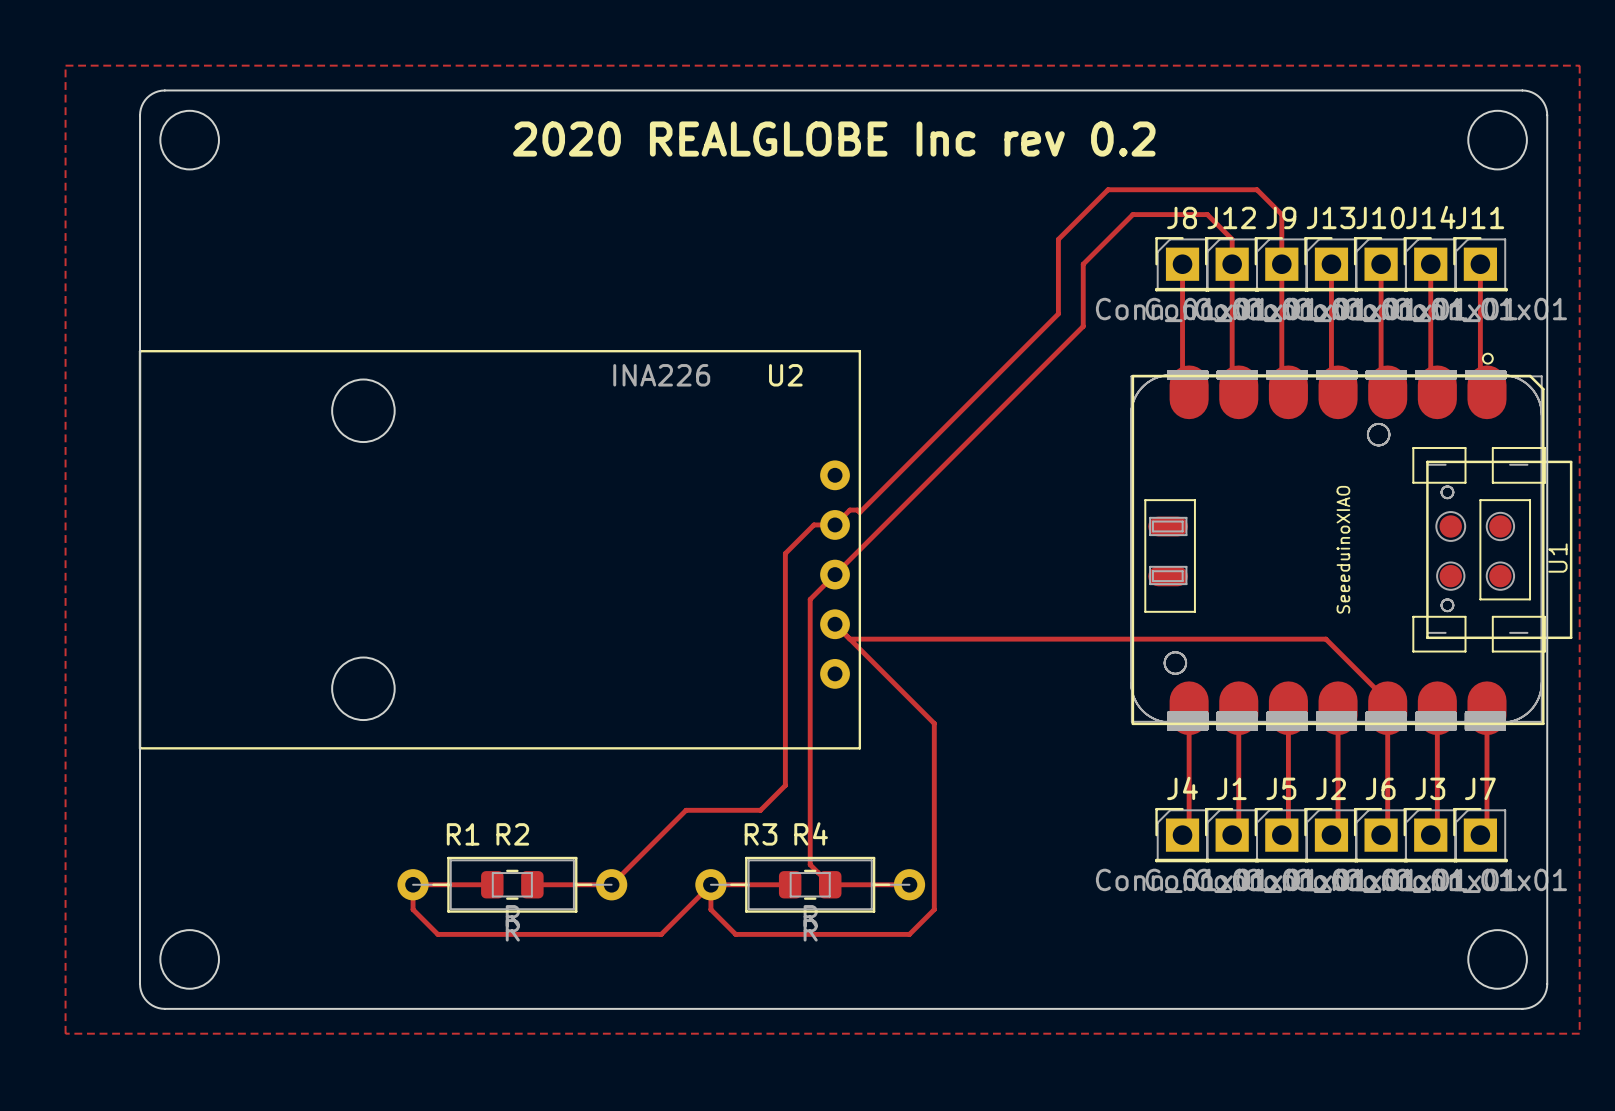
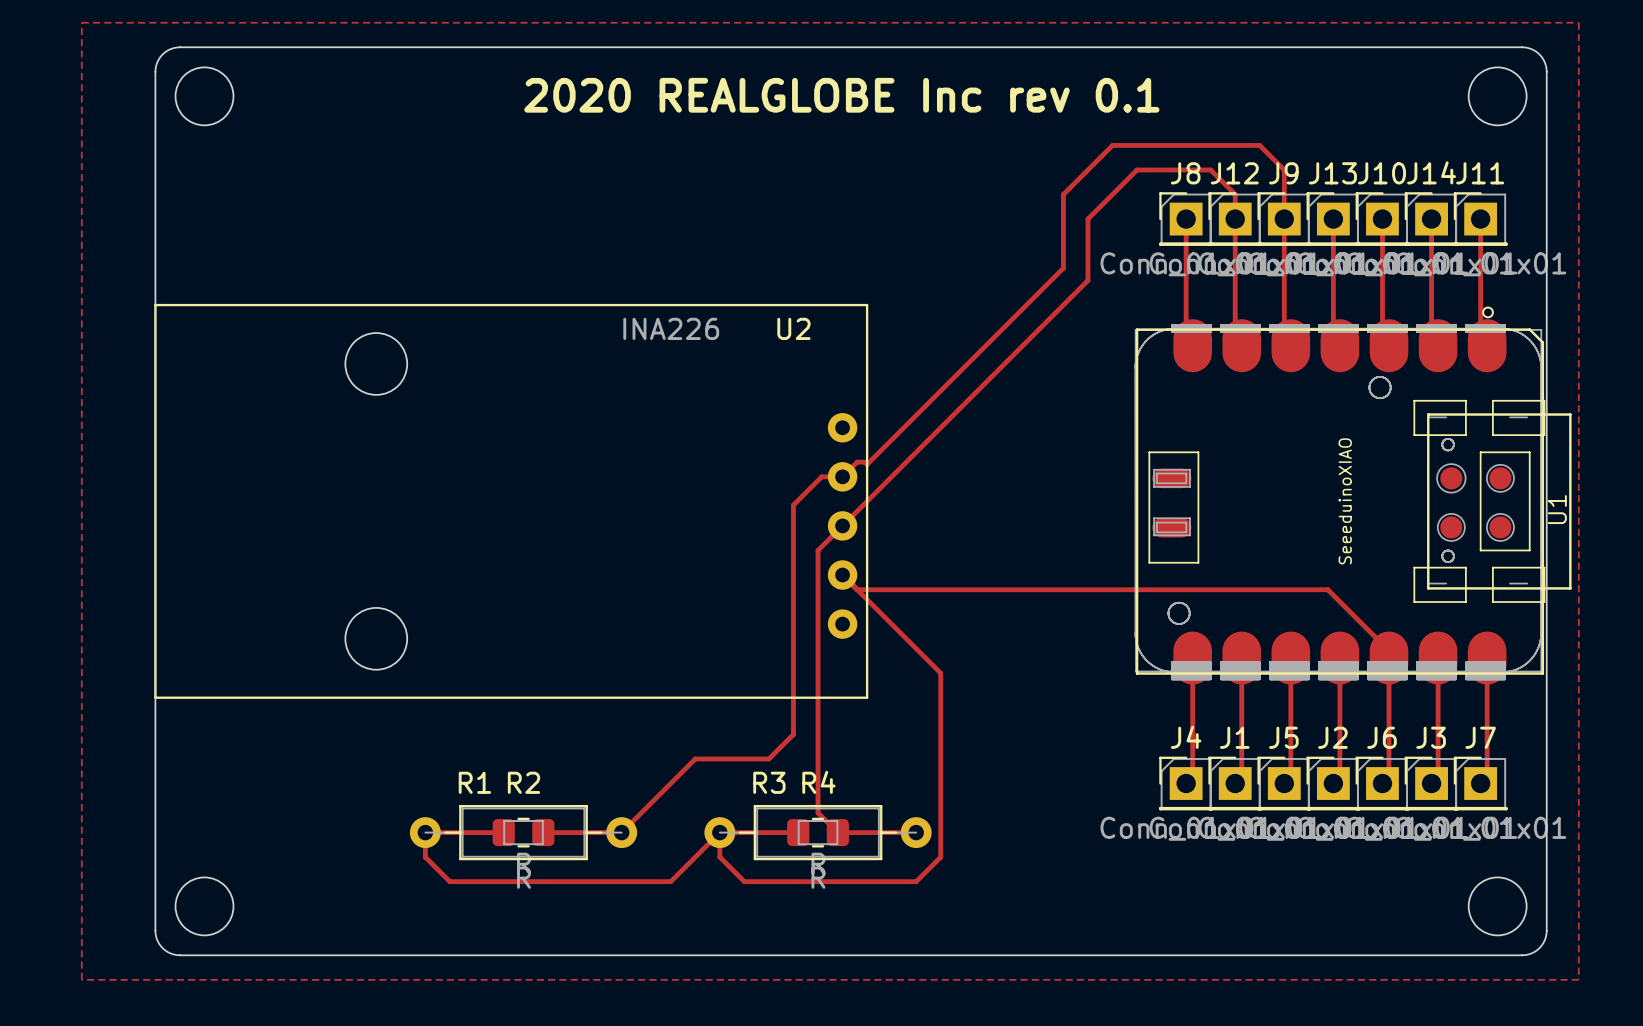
text: 2020 REALGLOBE Inc rev 0.2 (834, 139) -> 2020 REALGLOBE Inc rev 0.1 (841, 95)

